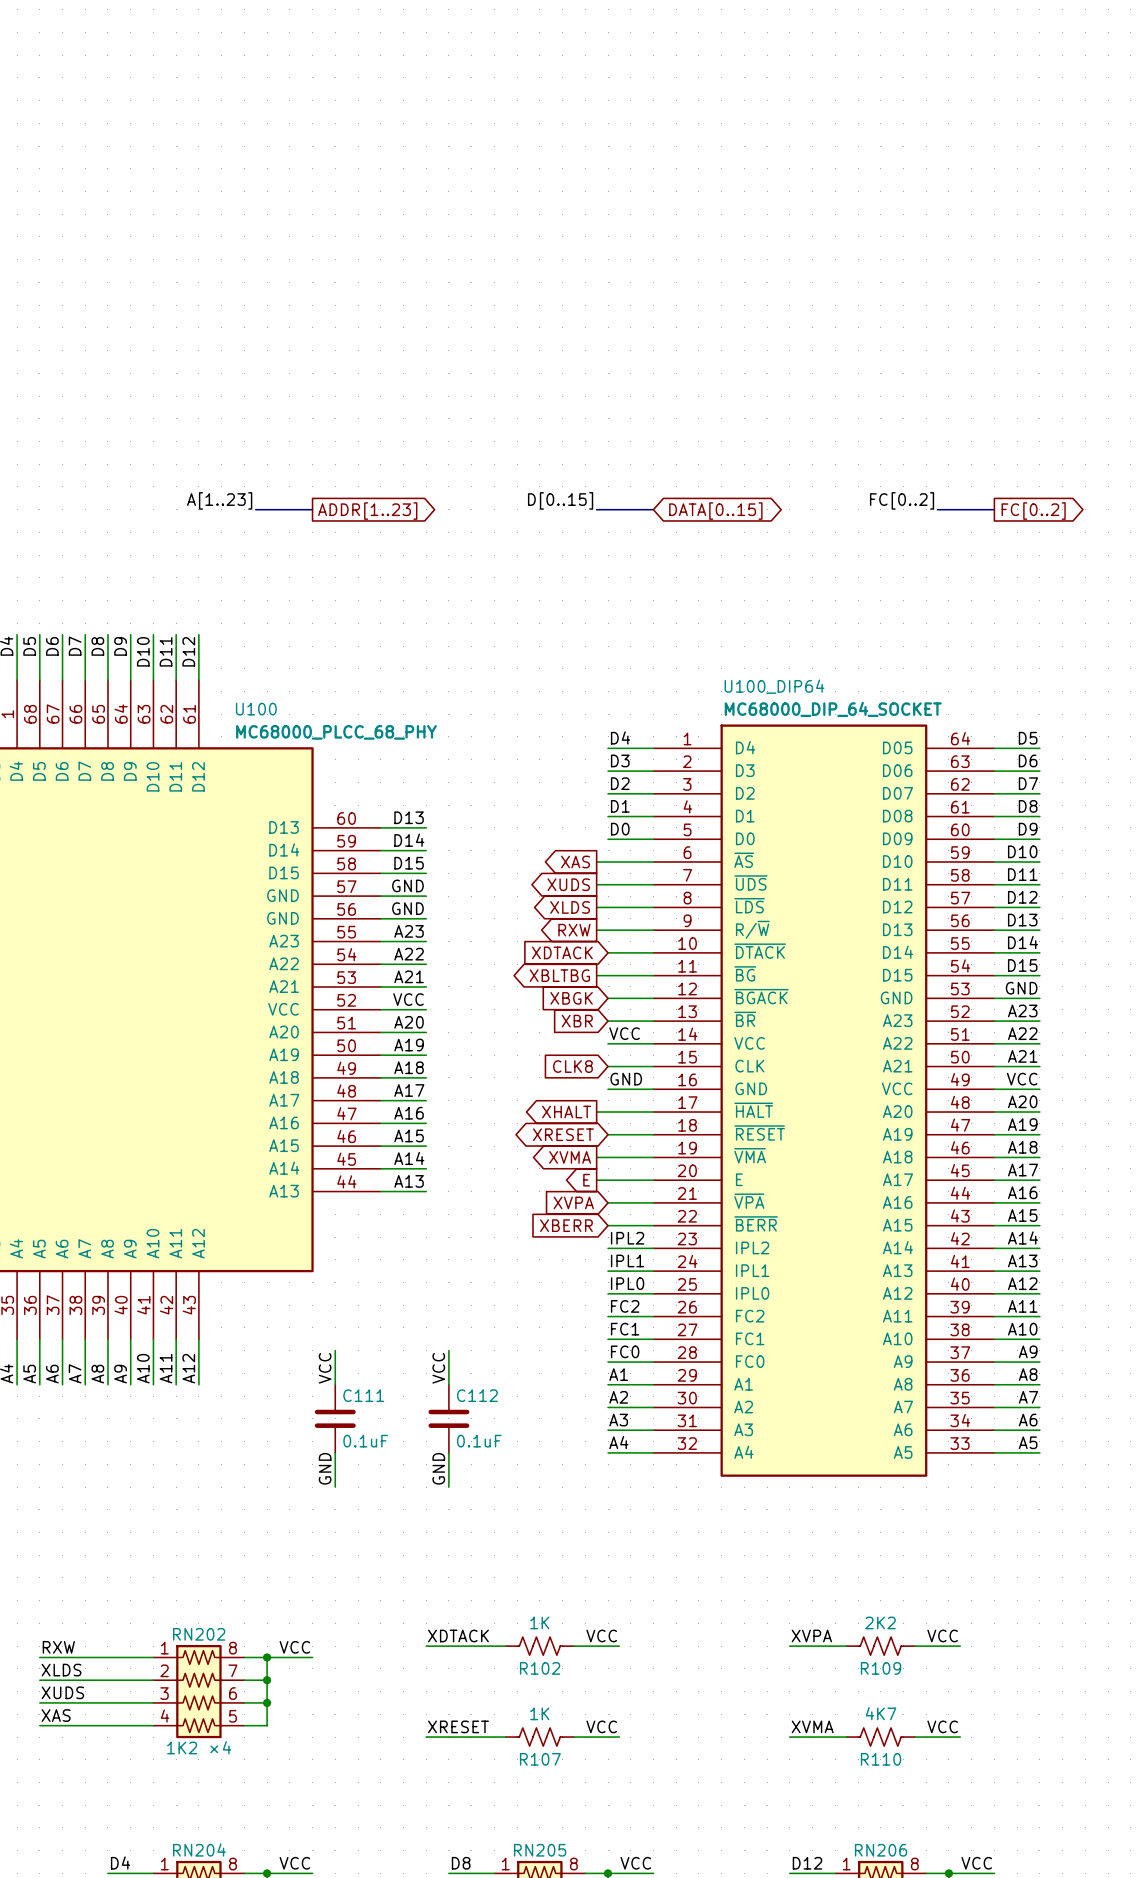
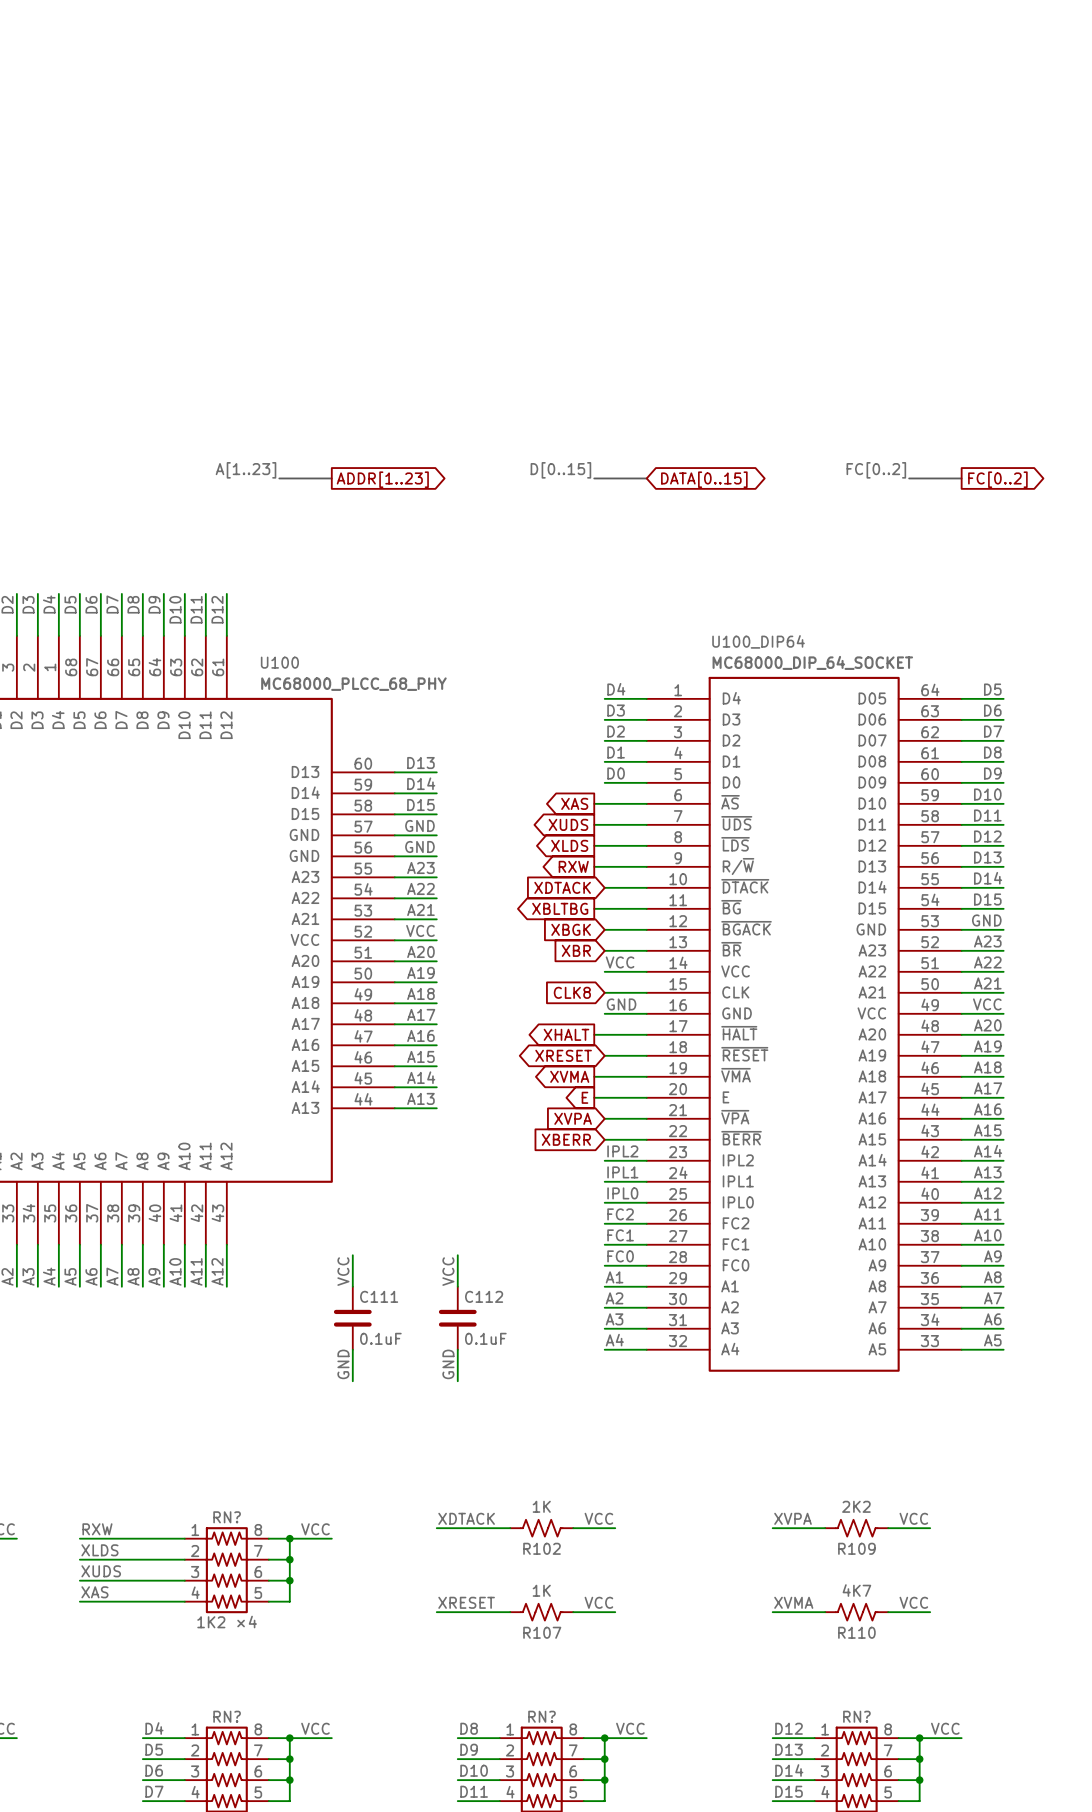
RN202 name: RN202 (199, 1634) -> RN? (227, 1517)
RN204 name: RN204 (199, 1849) -> RN? (227, 1716)
RN205 name: RN205 (540, 1850) -> RN? (542, 1716)
RN206 name: RN206 (881, 1850) -> RN? (856, 1716)

